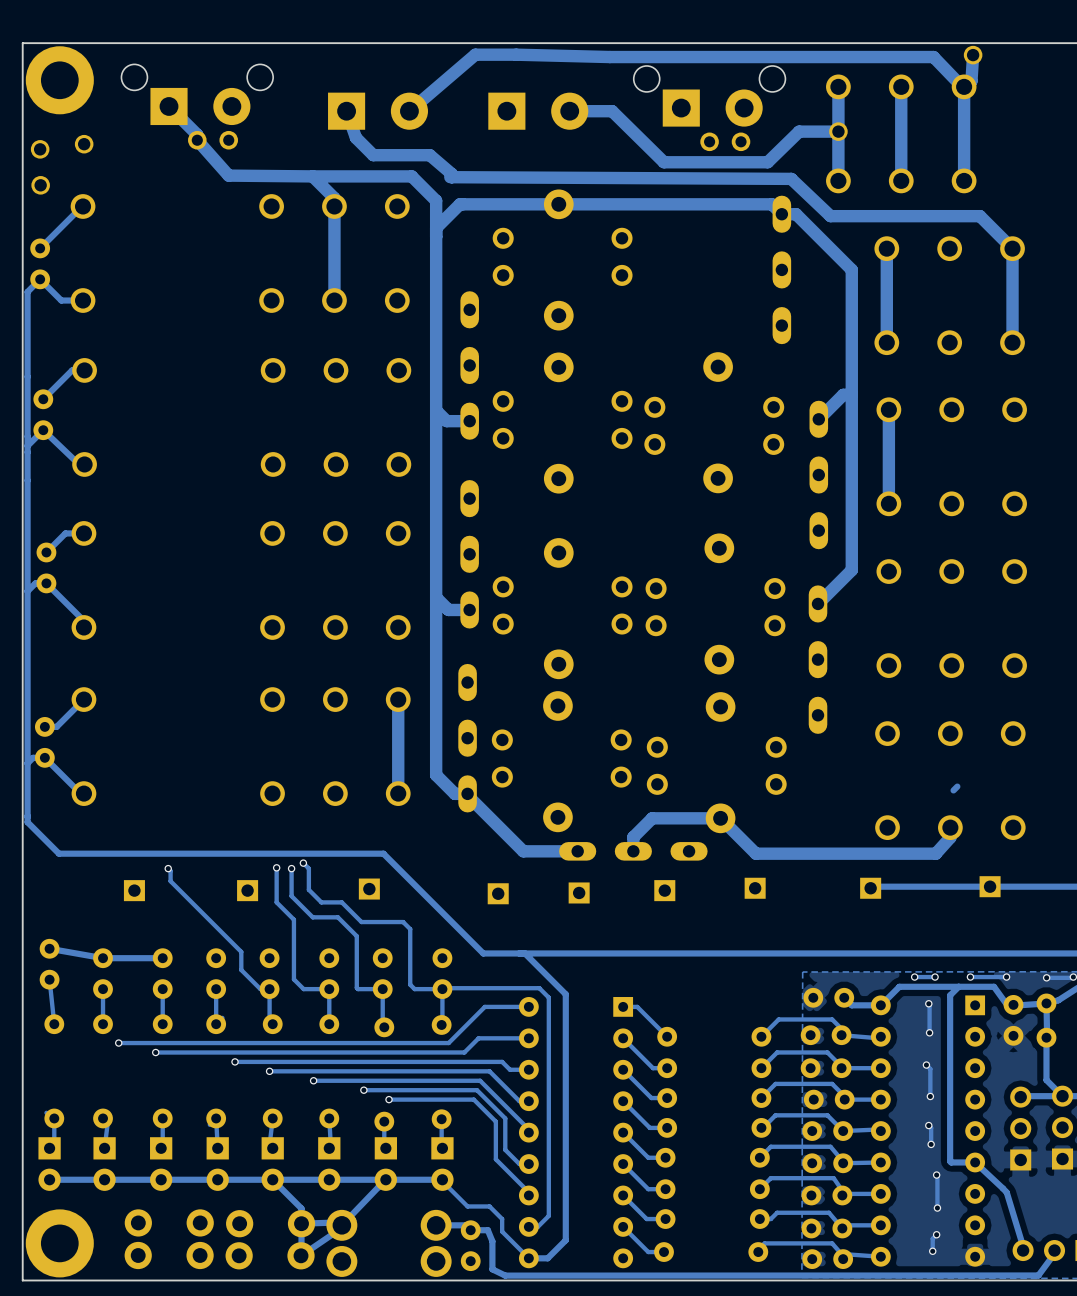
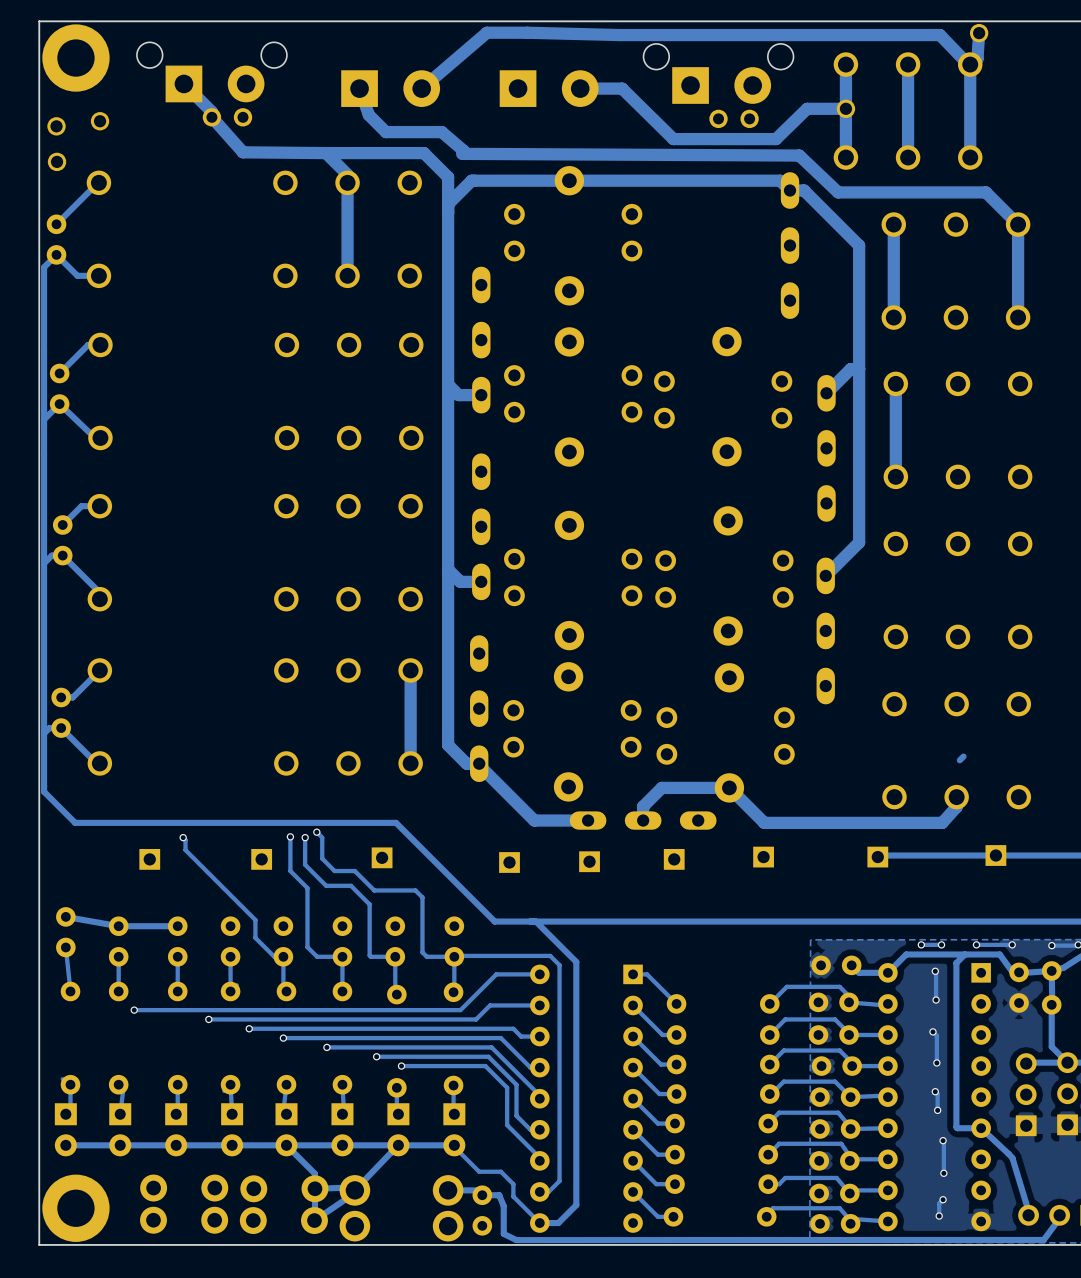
via position: (155, 1052) -> (208, 1019)
track: (464, 1052) (155, 1052) -> (476, 1019) (208, 1019)

